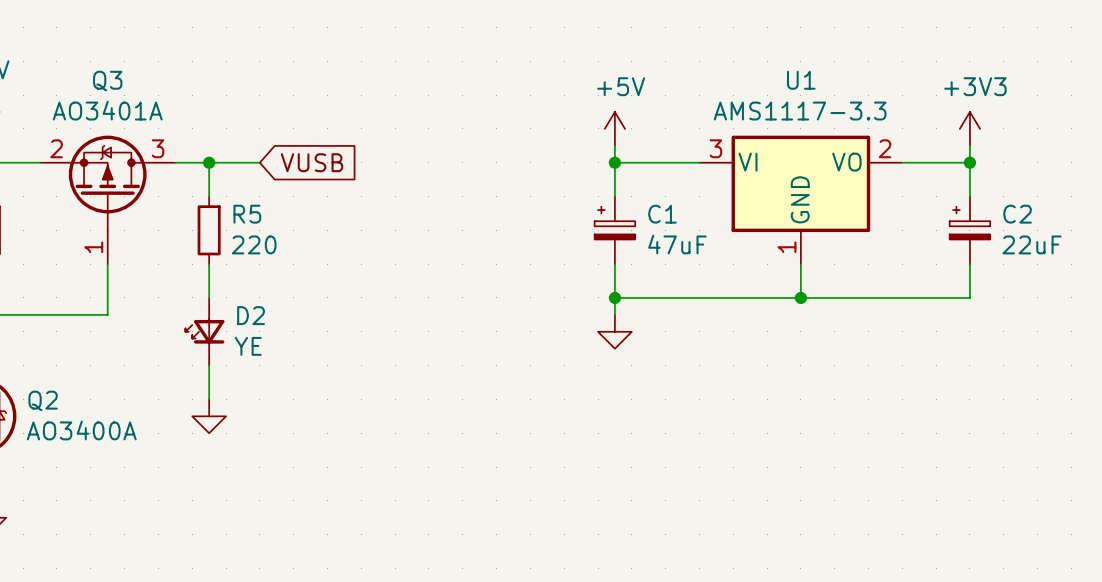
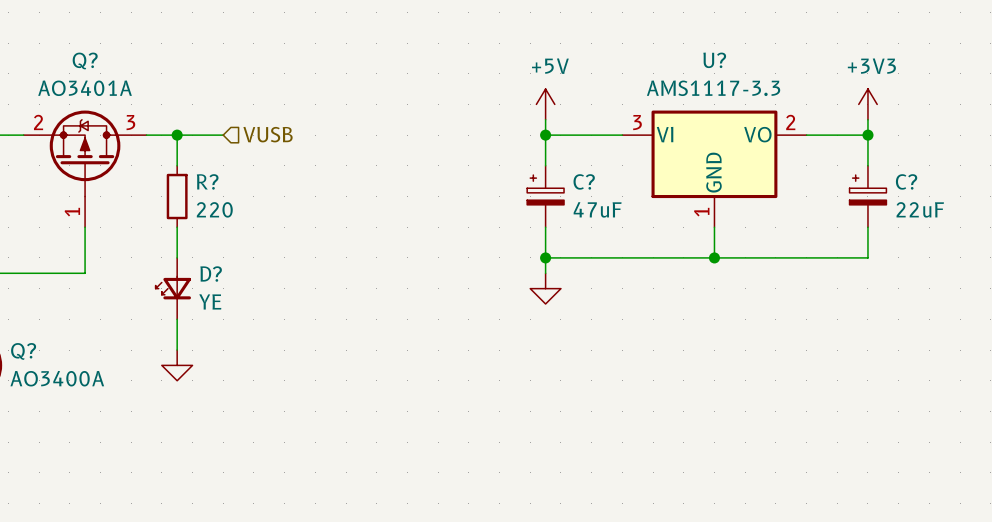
U1 name: U1 (801, 80) -> U? (714, 60)
Q3 name: Q3 (107, 81) -> Q? (85, 60)
global label: VUSB (312, 162) -> none
hierarchical label: none -> VUSB (268, 134)
R5 name: R5 (247, 214) -> R? (207, 181)
C1 name: C1 (662, 214) -> C? (584, 181)
C2 name: C2 (1017, 214) -> C? (906, 181)
D2 name: D2 (251, 315) -> D? (211, 274)
Q2 name: Q2 (43, 400) -> Q? (23, 351)

